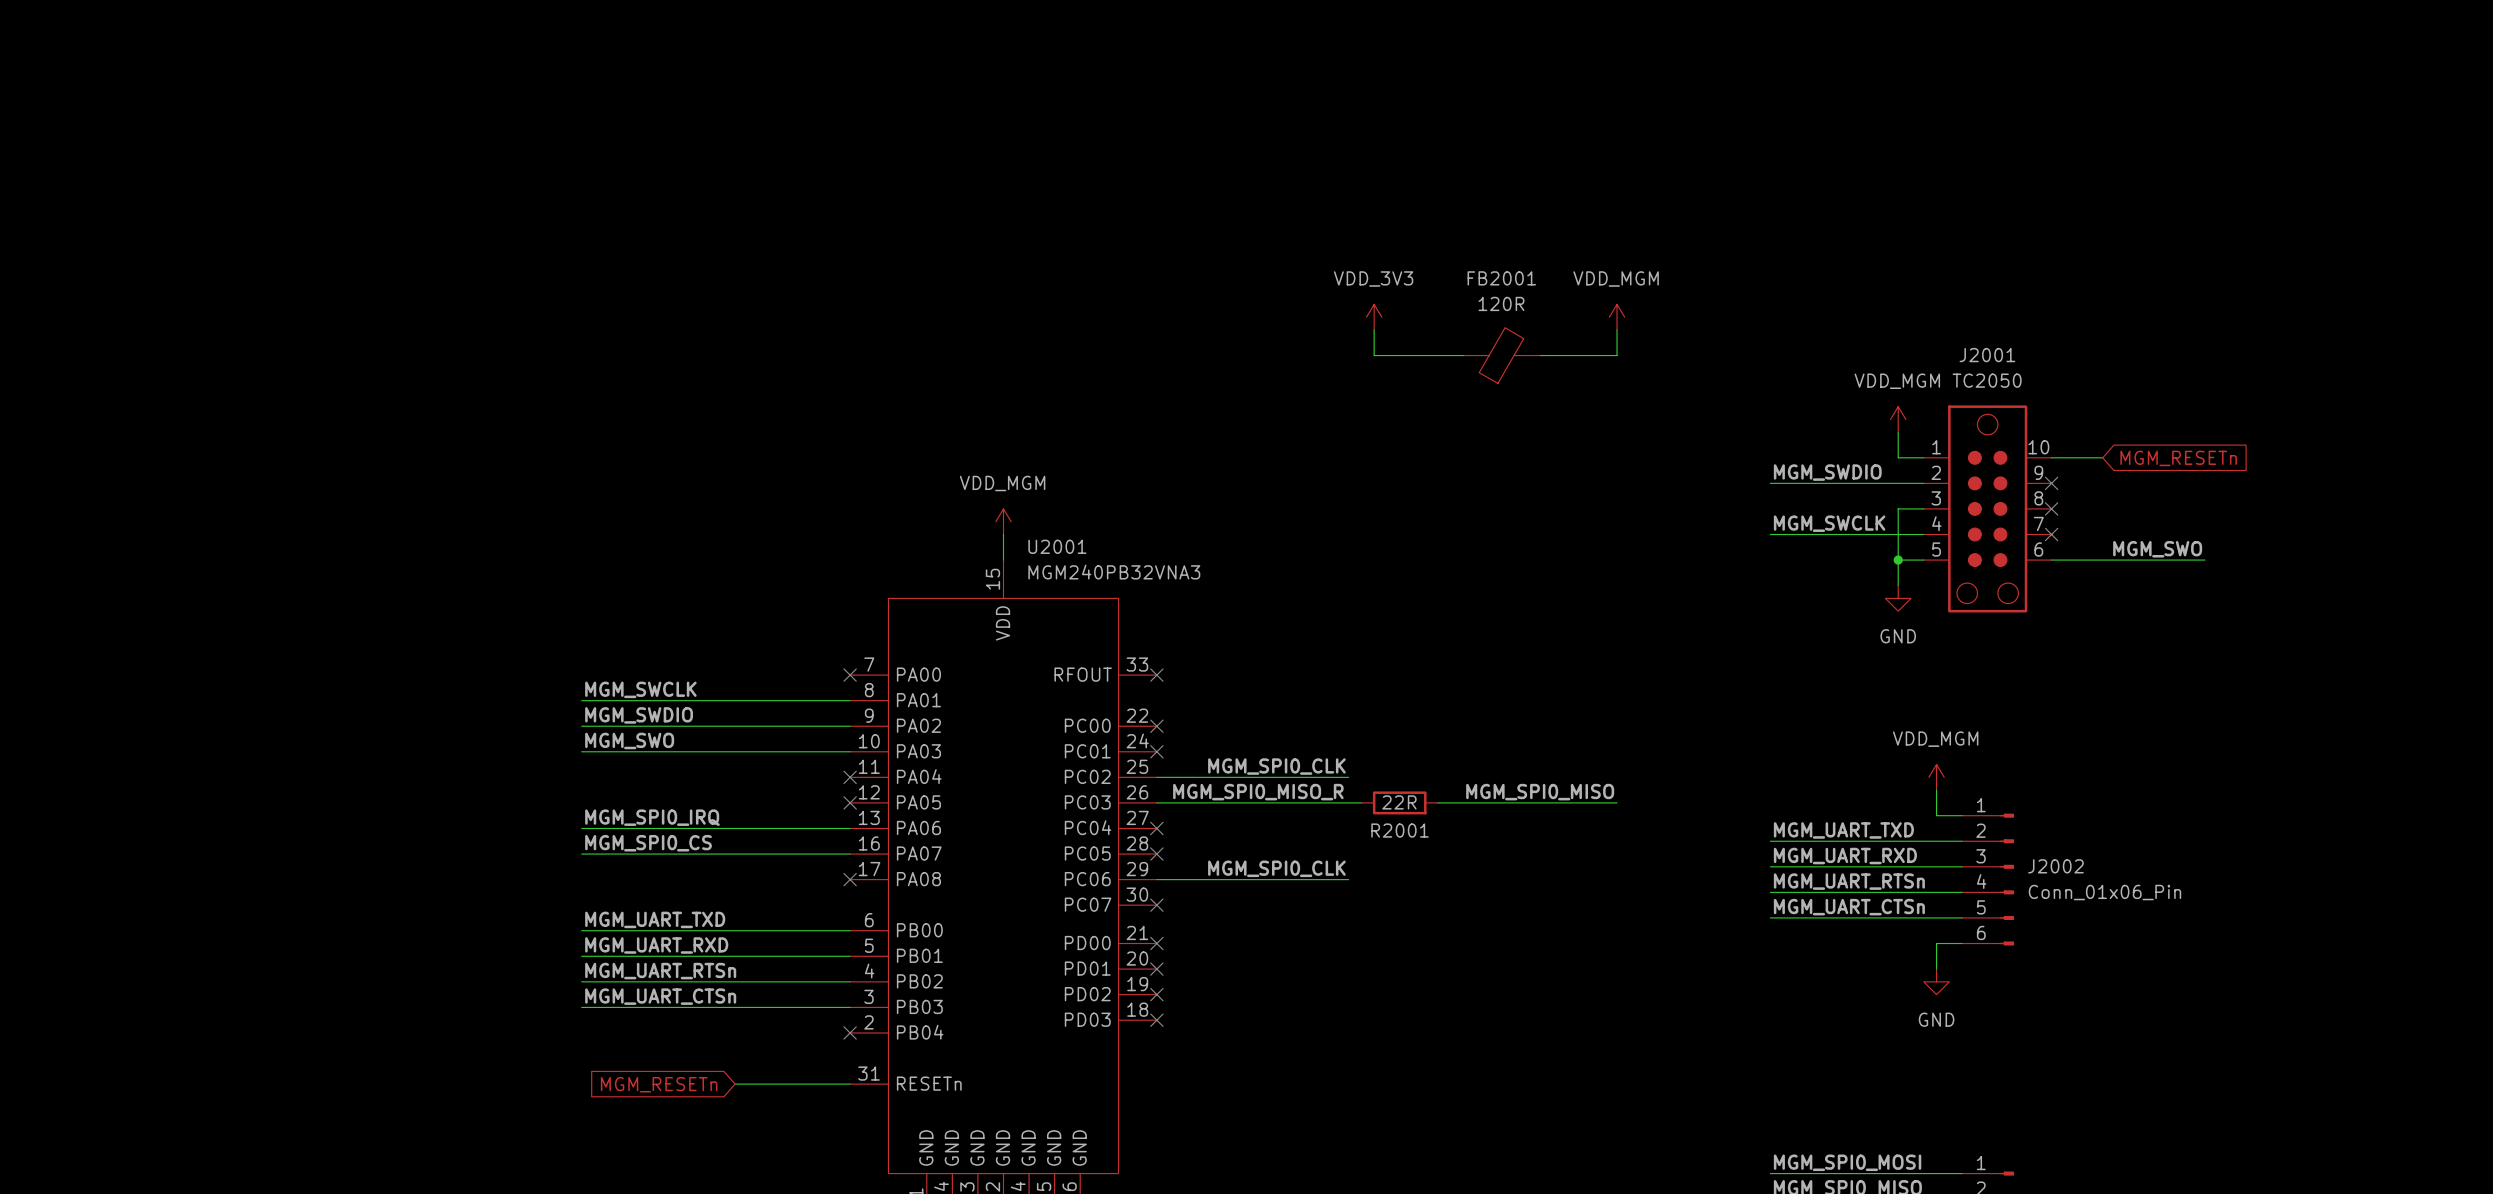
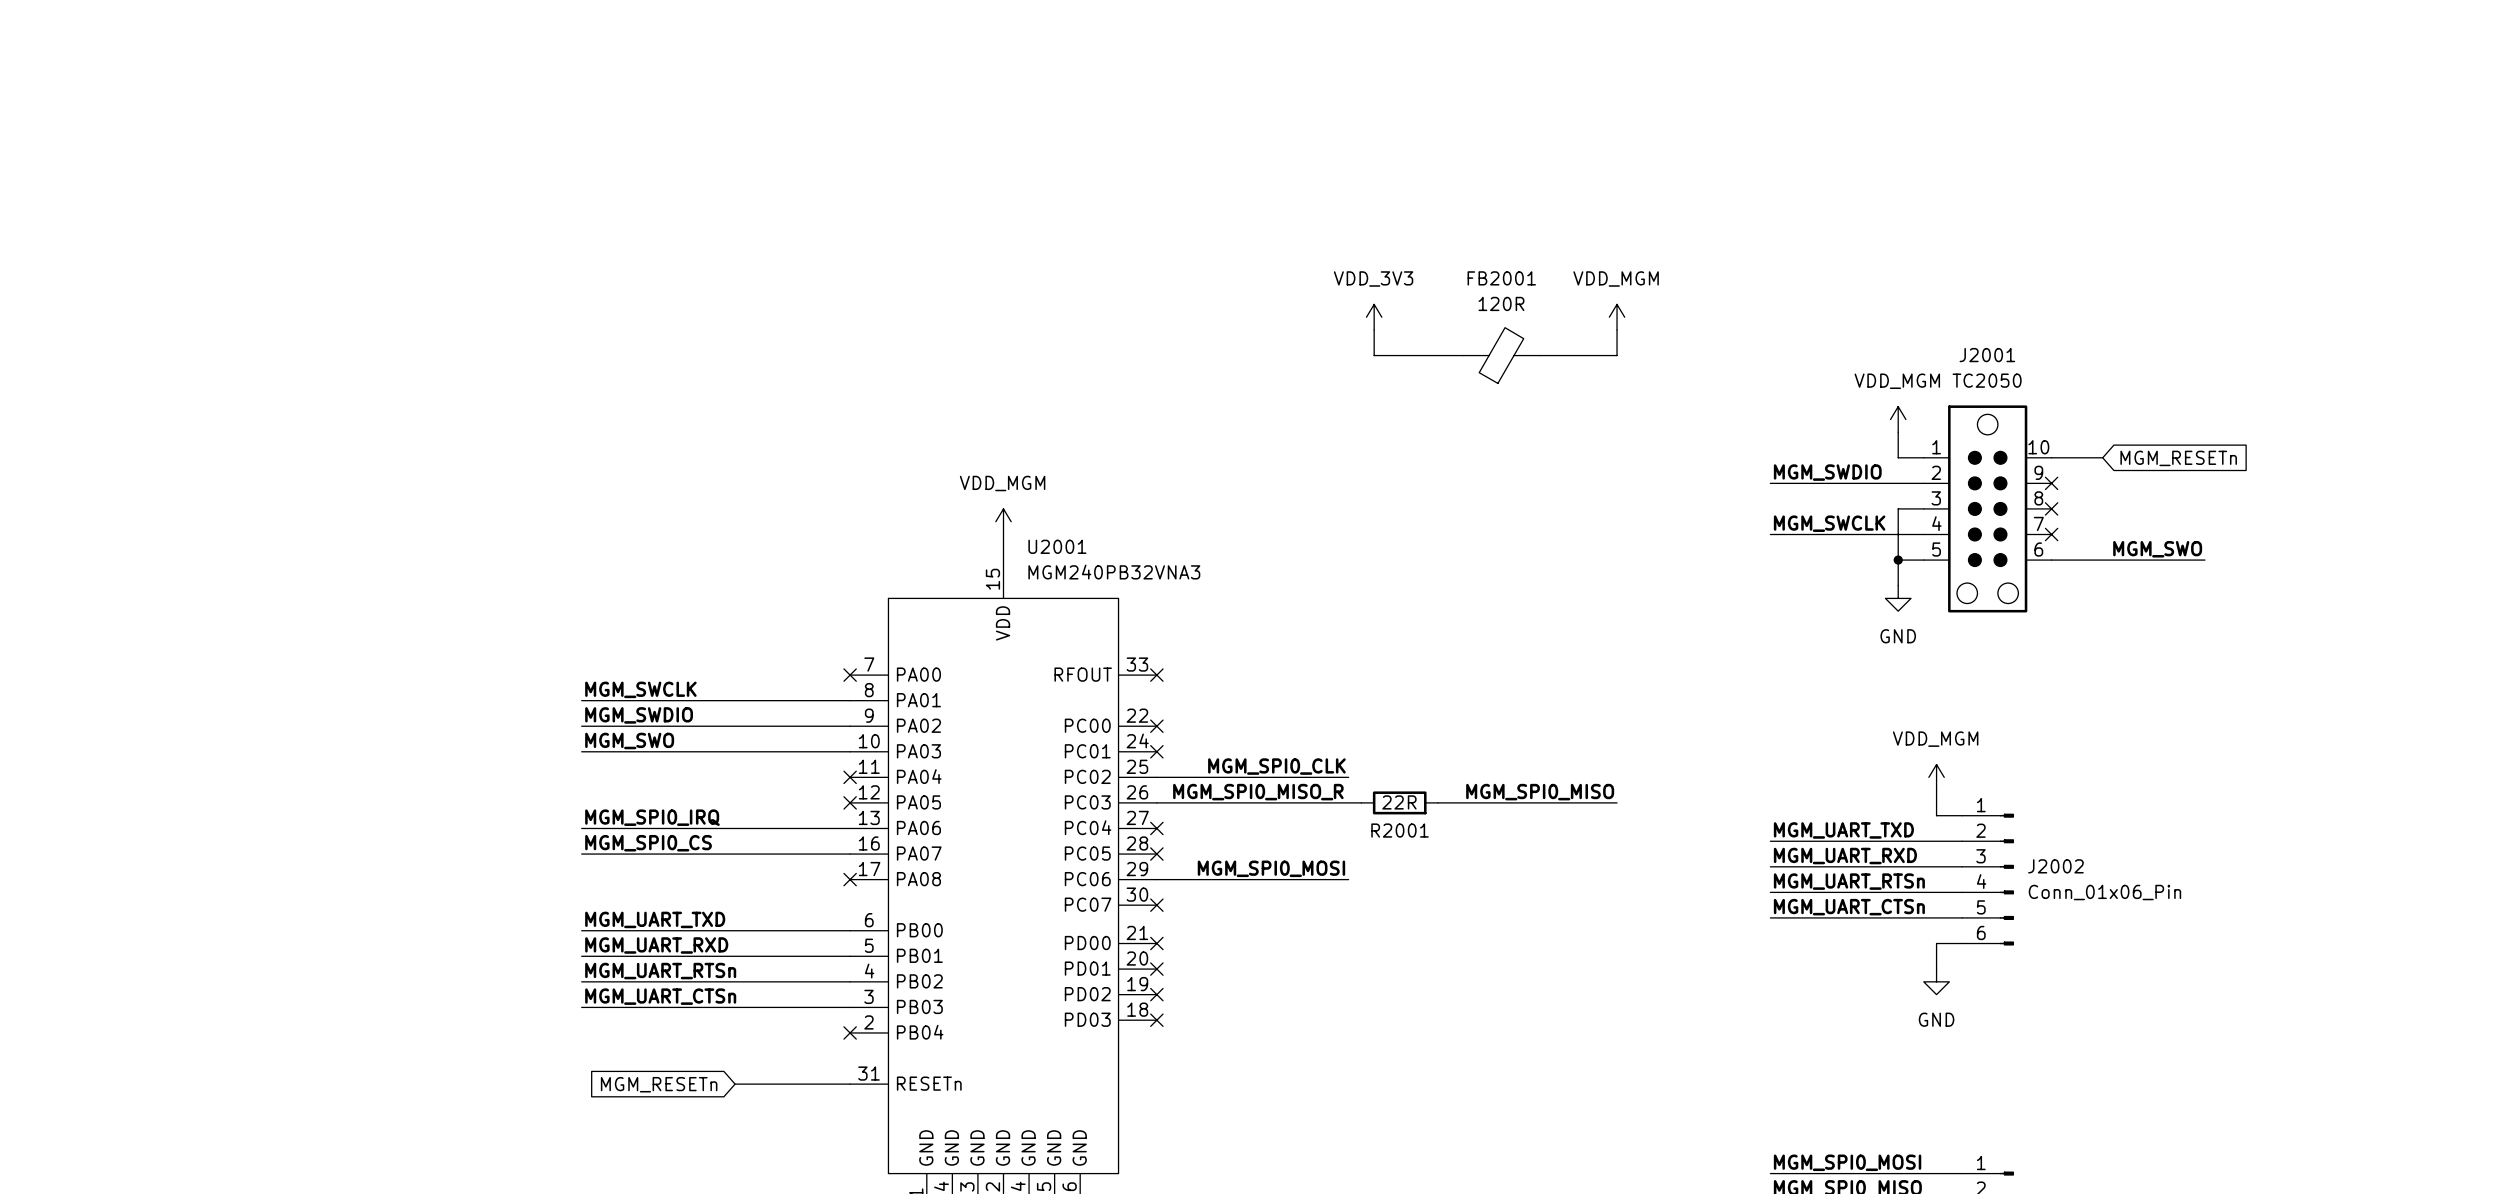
label: MGM_SPI0_CLK (1276, 868) -> MGM_SPI0_MOSI (1271, 868)

